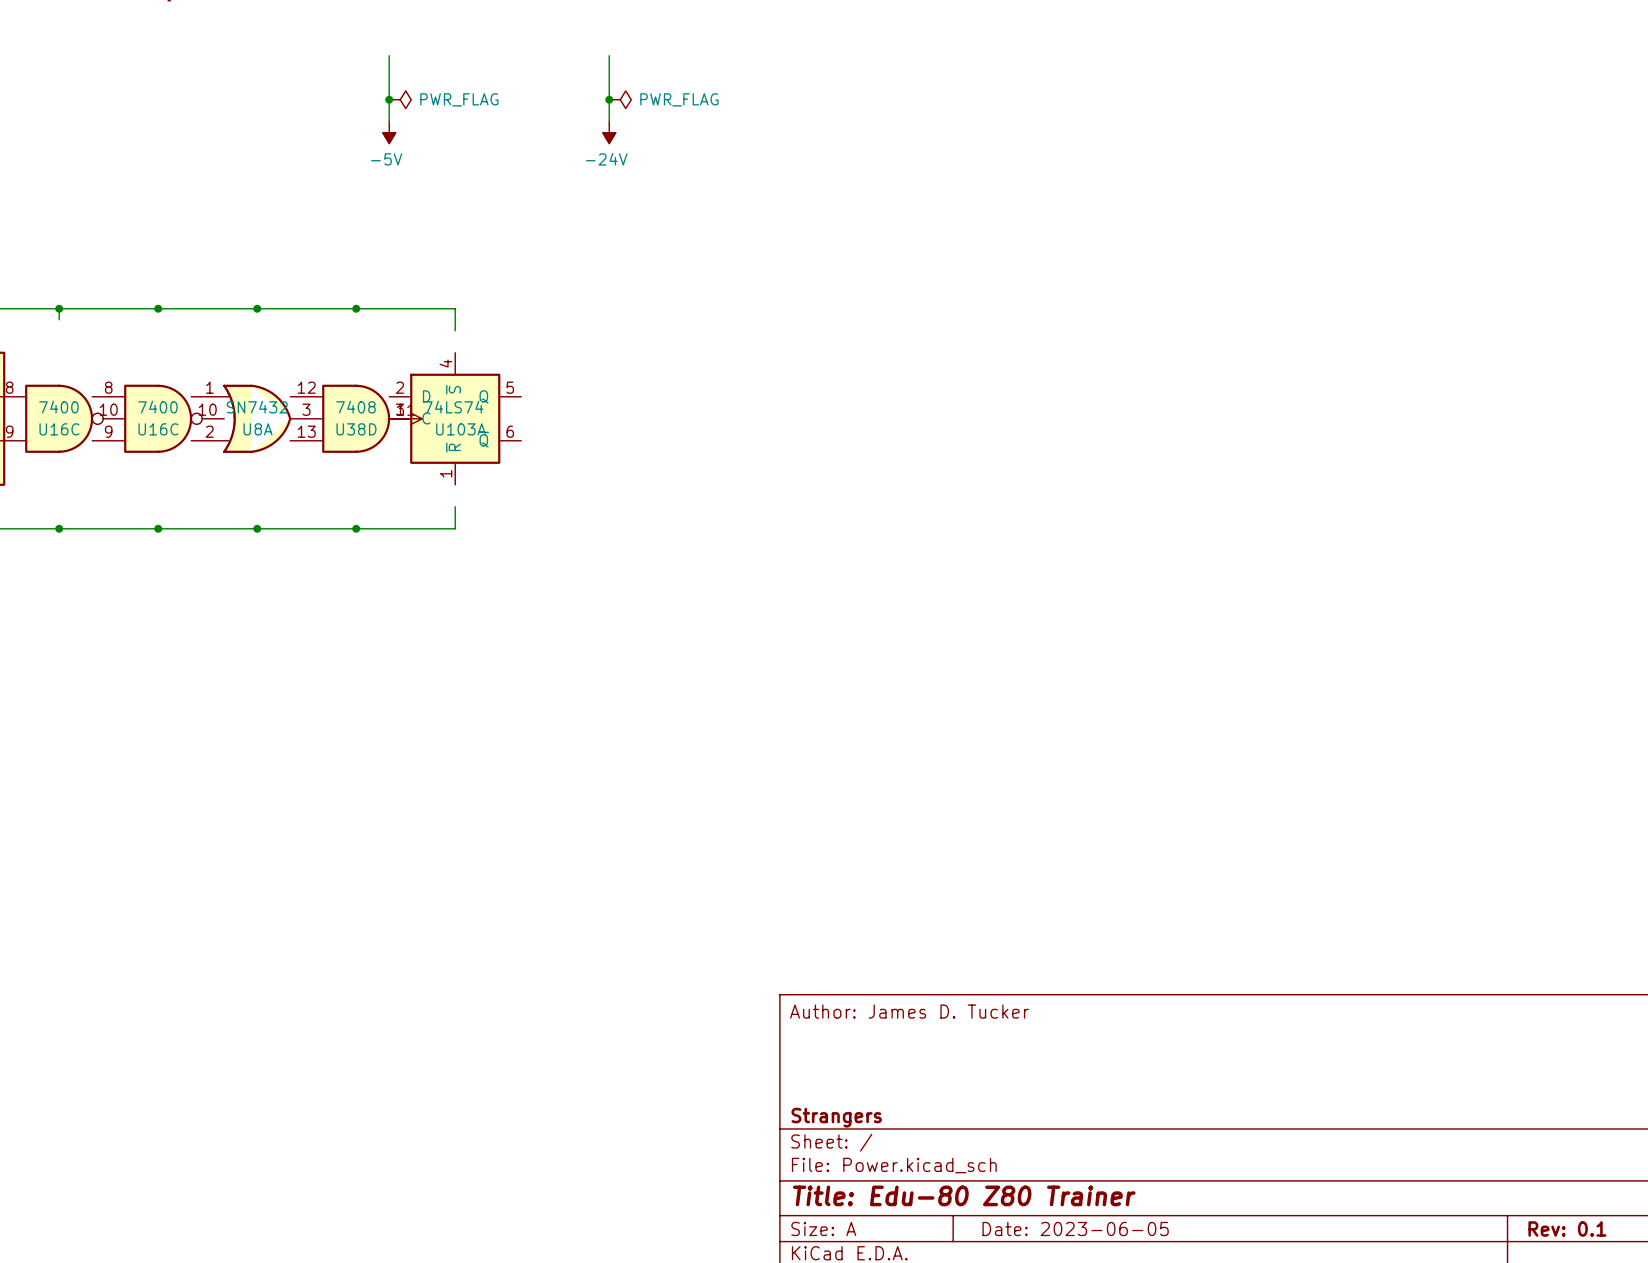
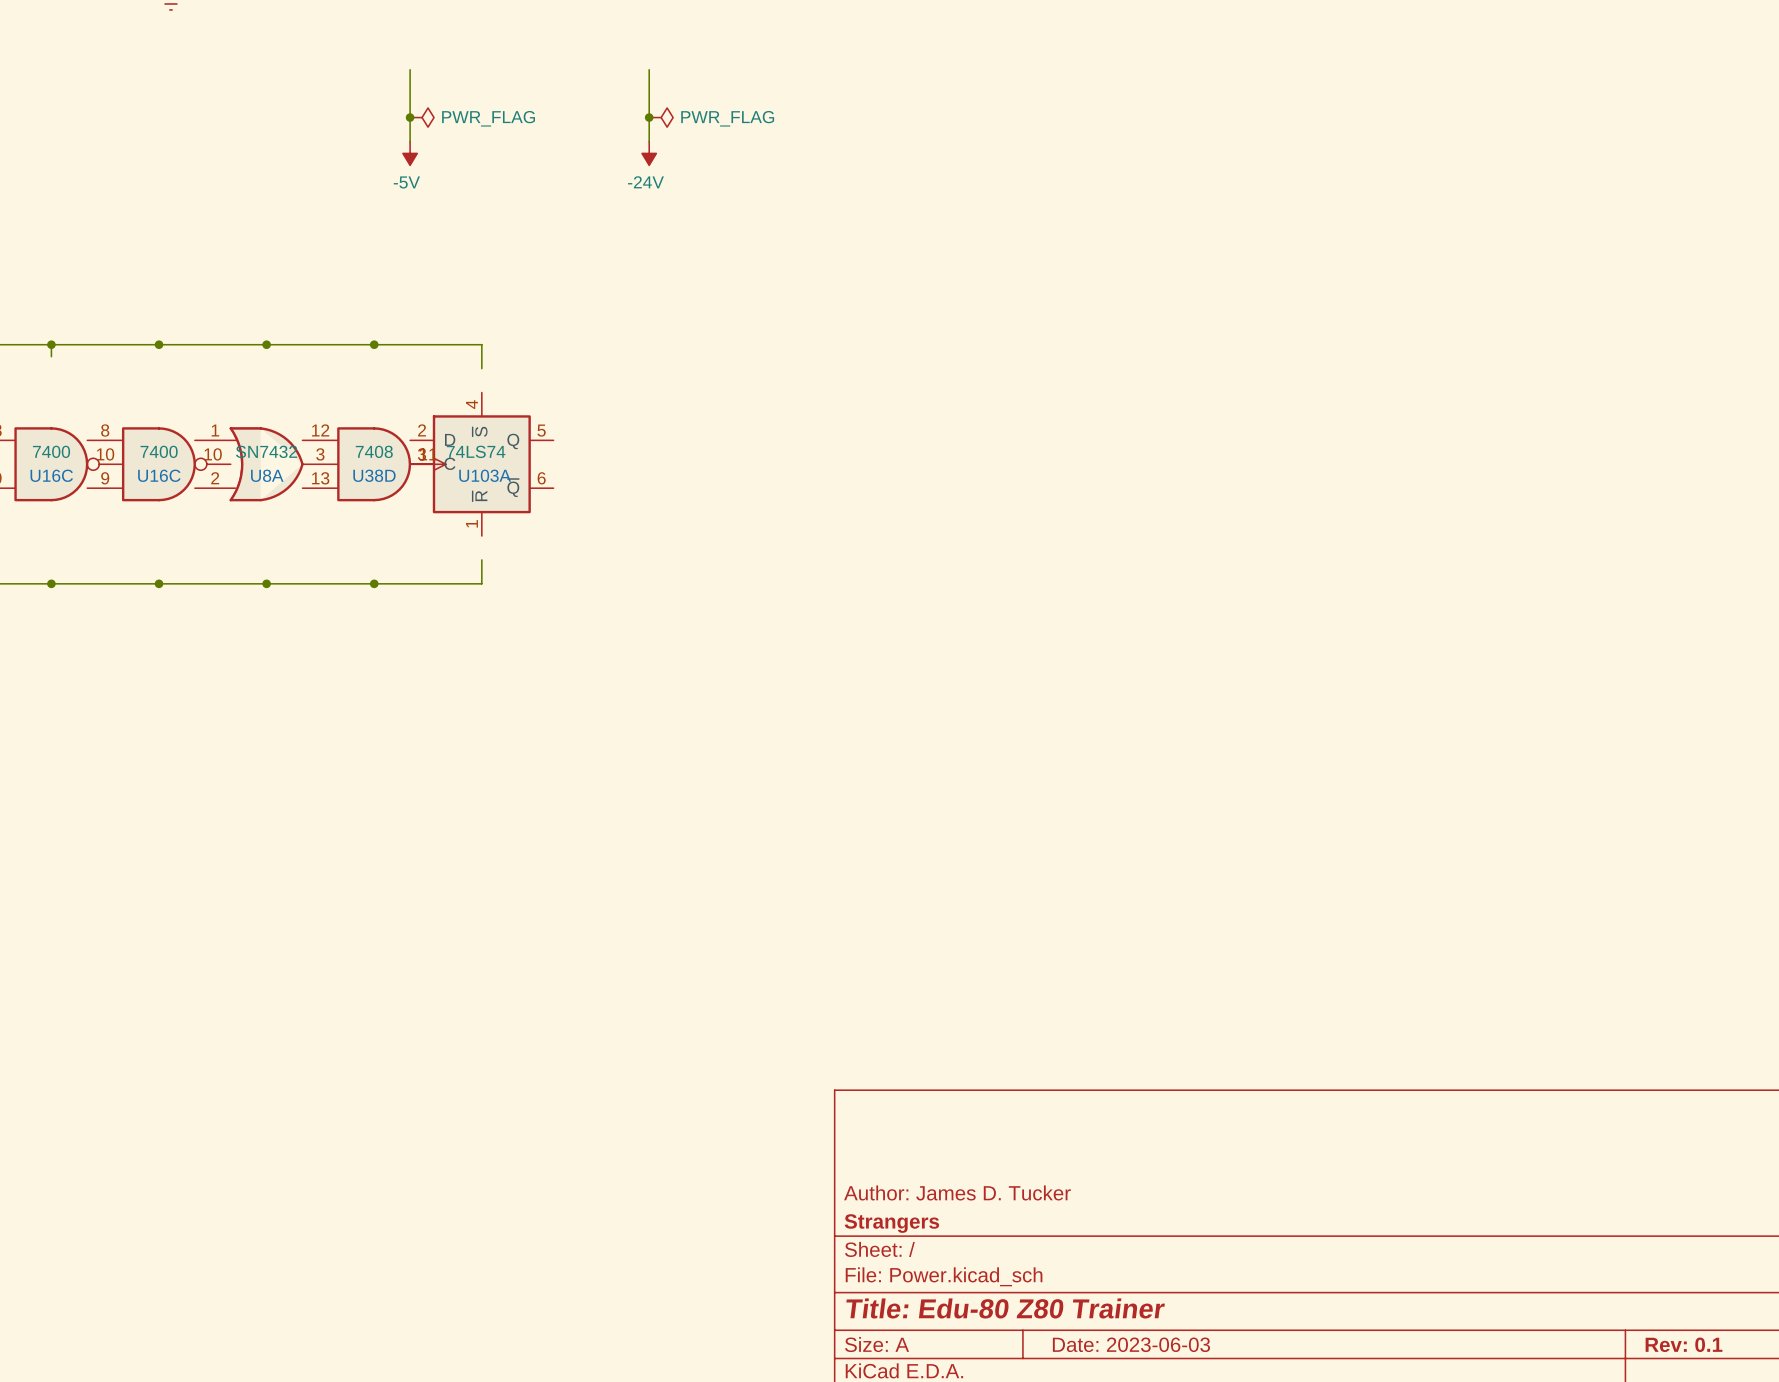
title block position: Author: James D. Tucker (909, 1011) -> Author: James D. Tucker (957, 1192)
title block: Date: 2023-06-05 (1075, 1228) -> Date: 2023-06-03 (1131, 1344)

